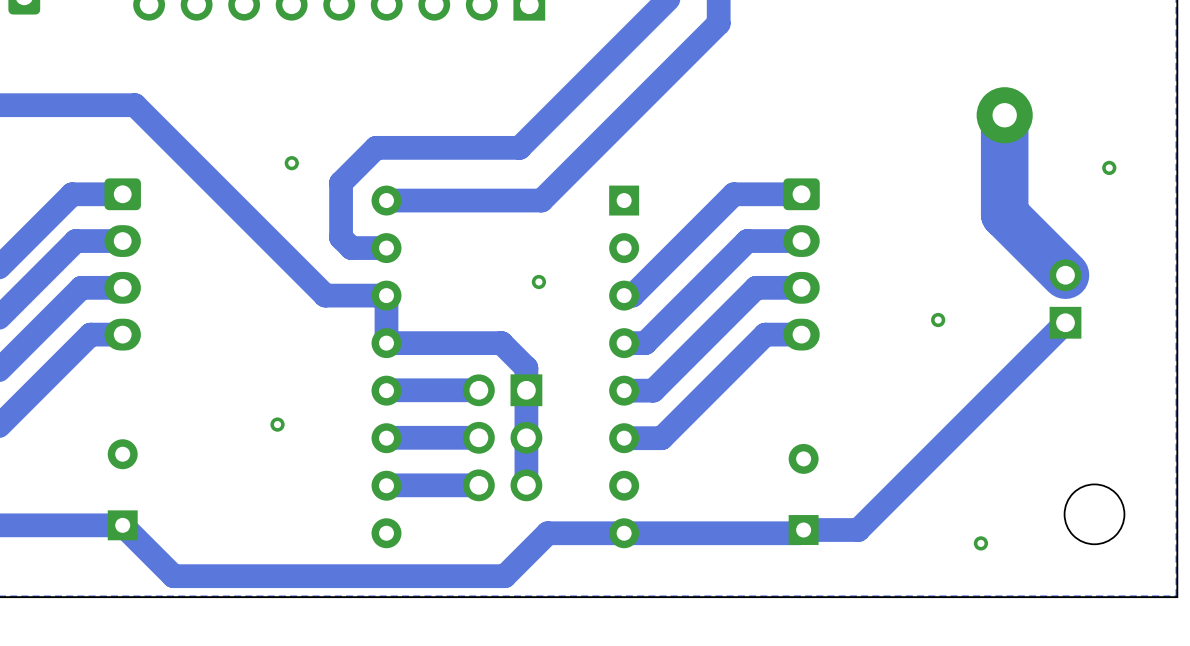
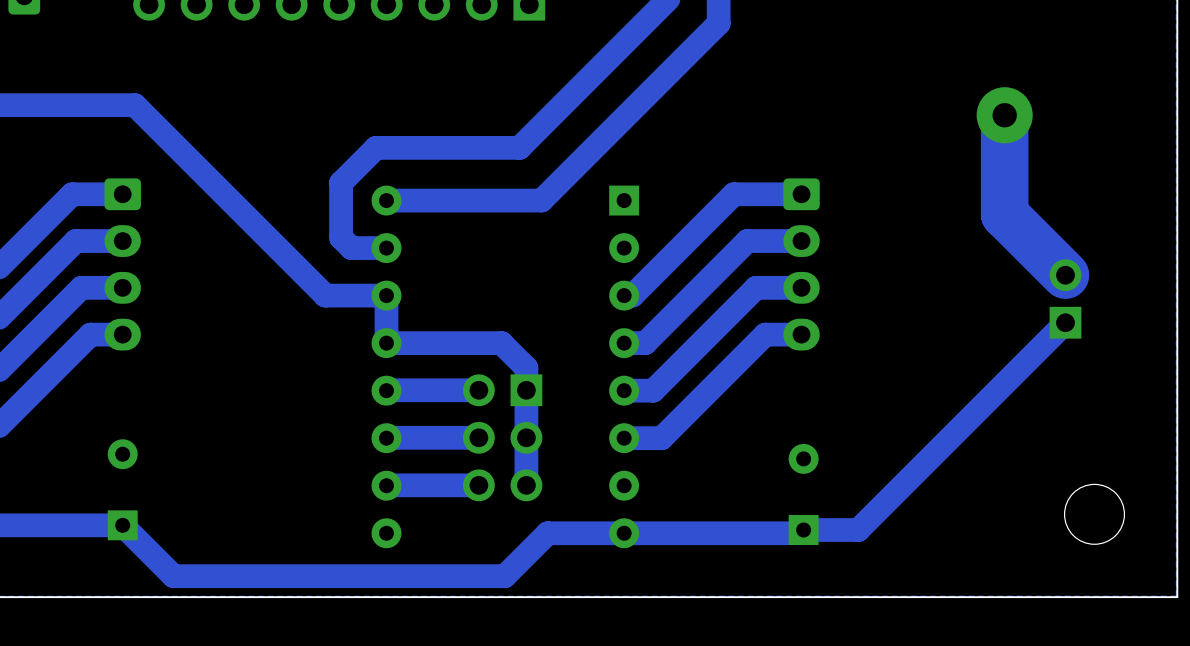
via: (291, 163) -> none
via: (1109, 167) -> none
via: (538, 281) -> none
via: (938, 320) -> none
via: (277, 424) -> none
via: (980, 543) -> none

